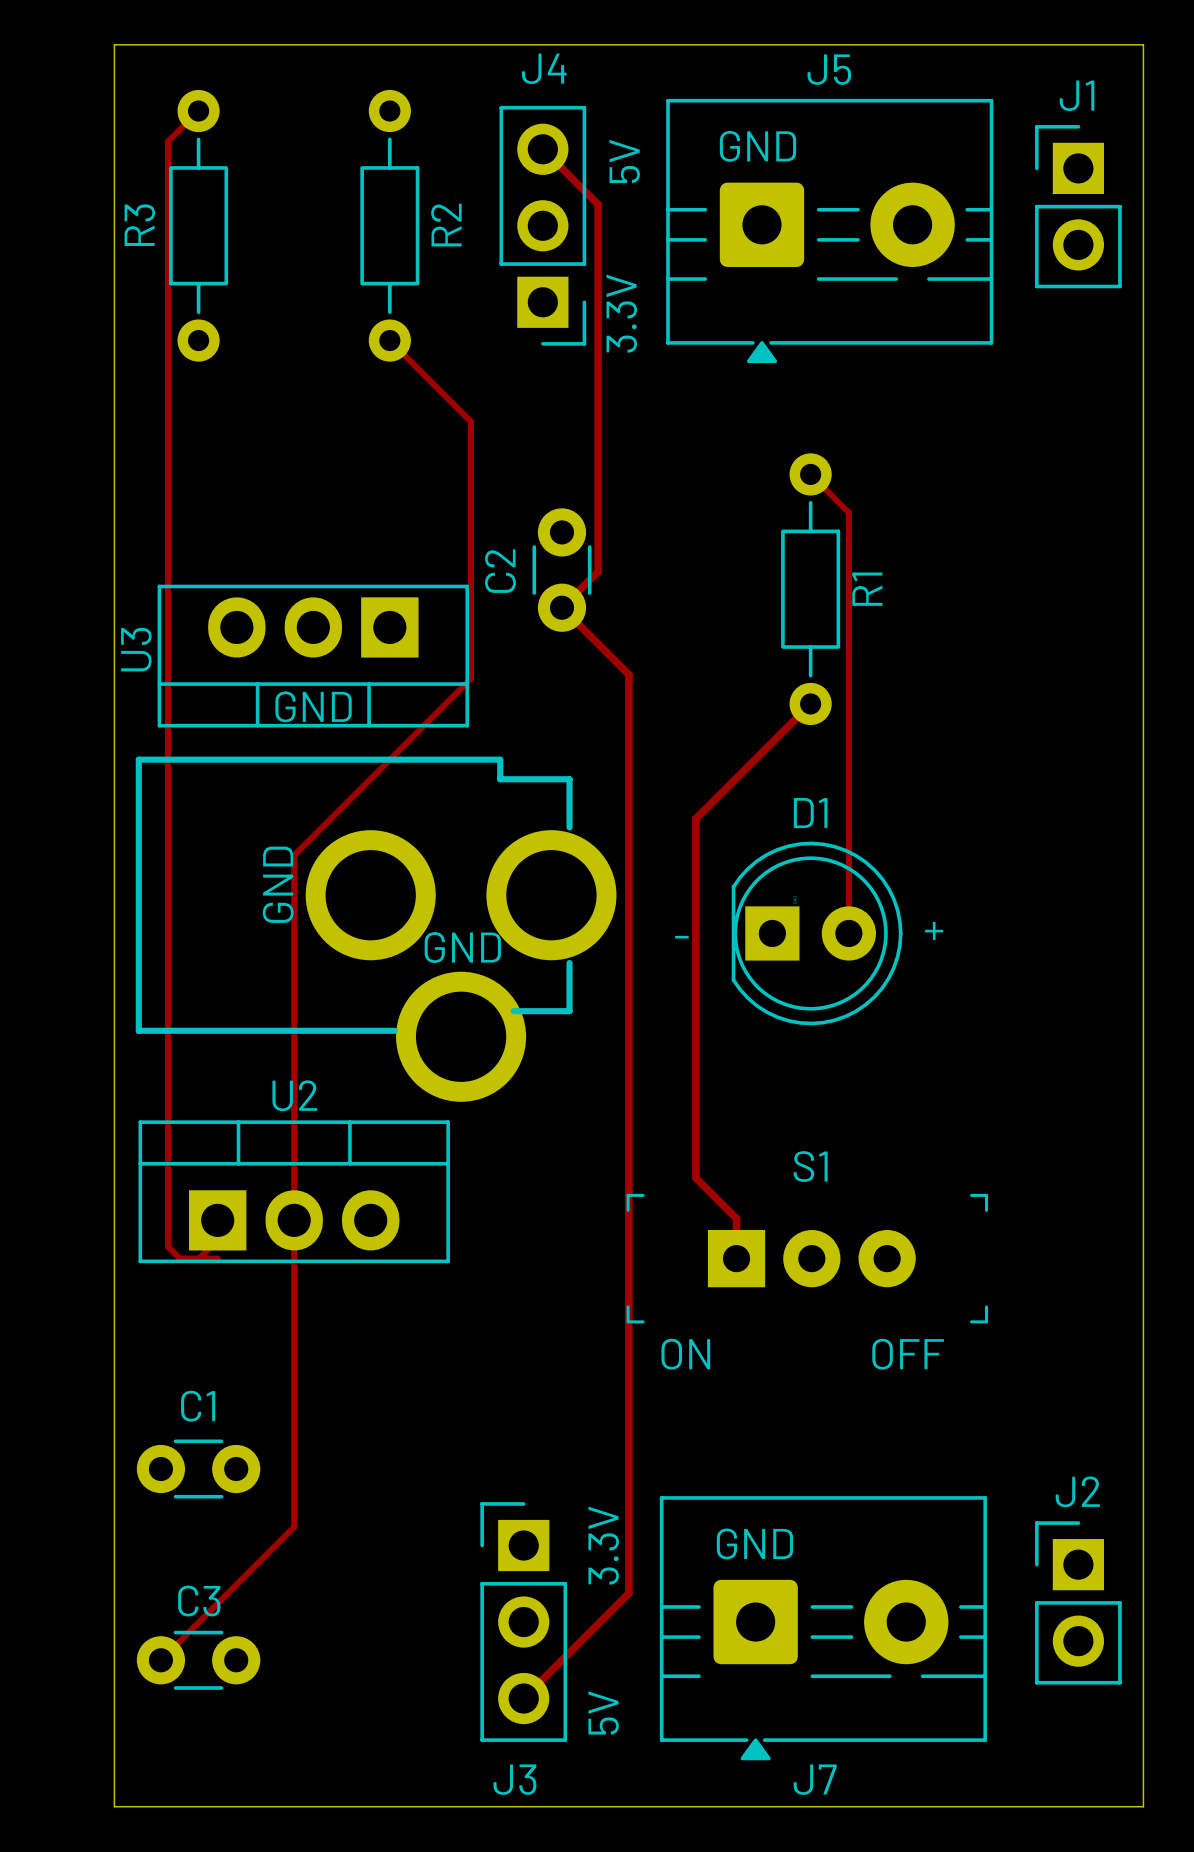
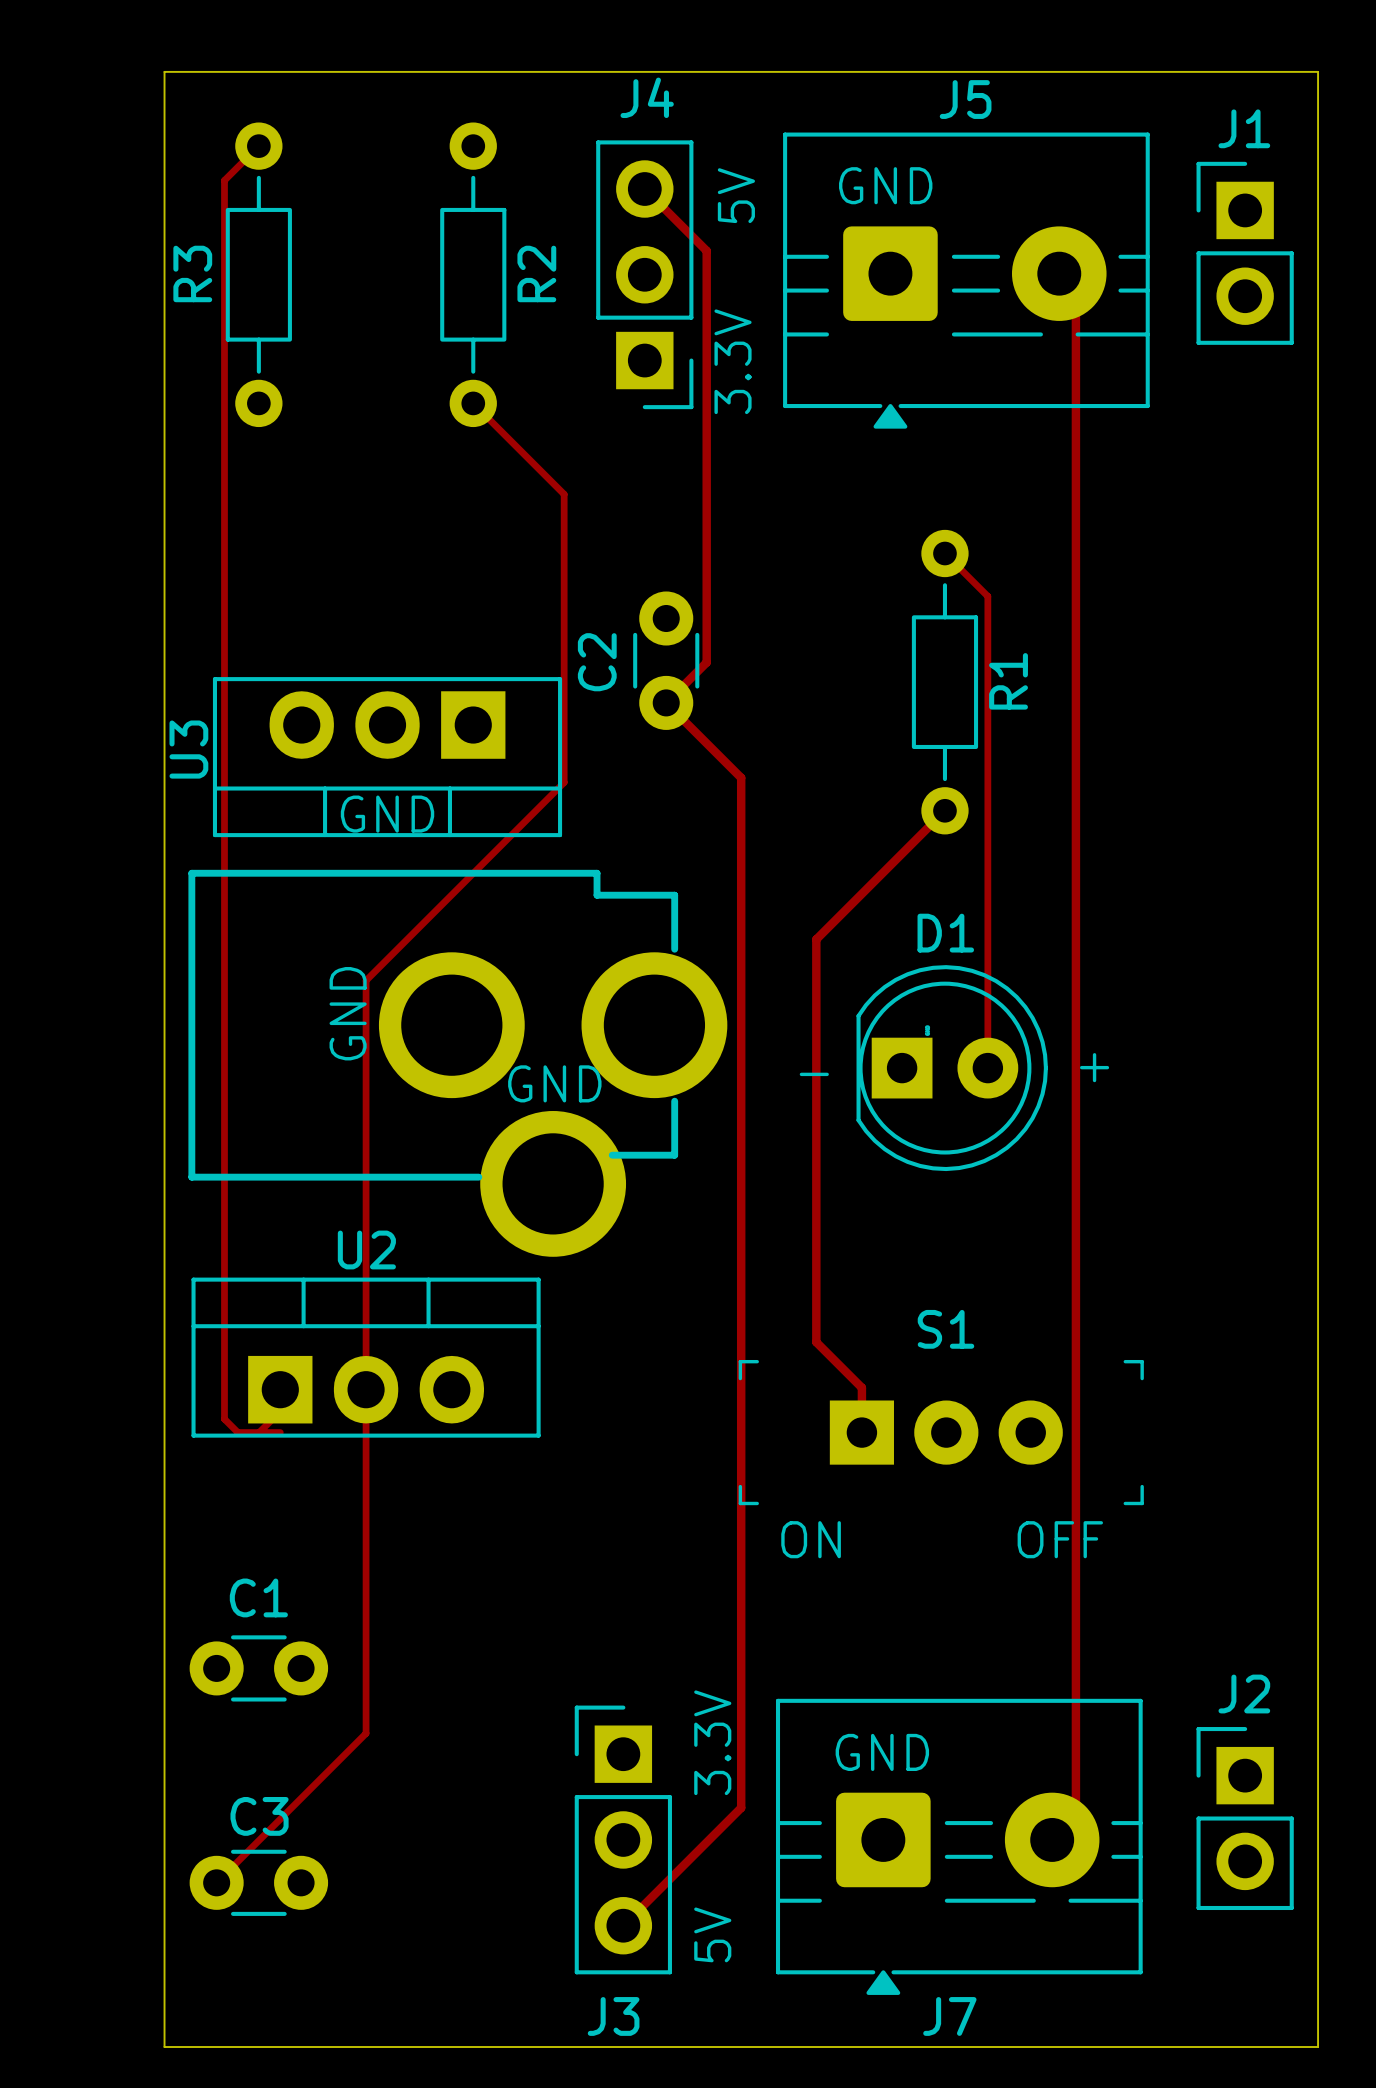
track: none -> (1059, 273) (1075, 290) (1075, 1816) (1052, 1839)

